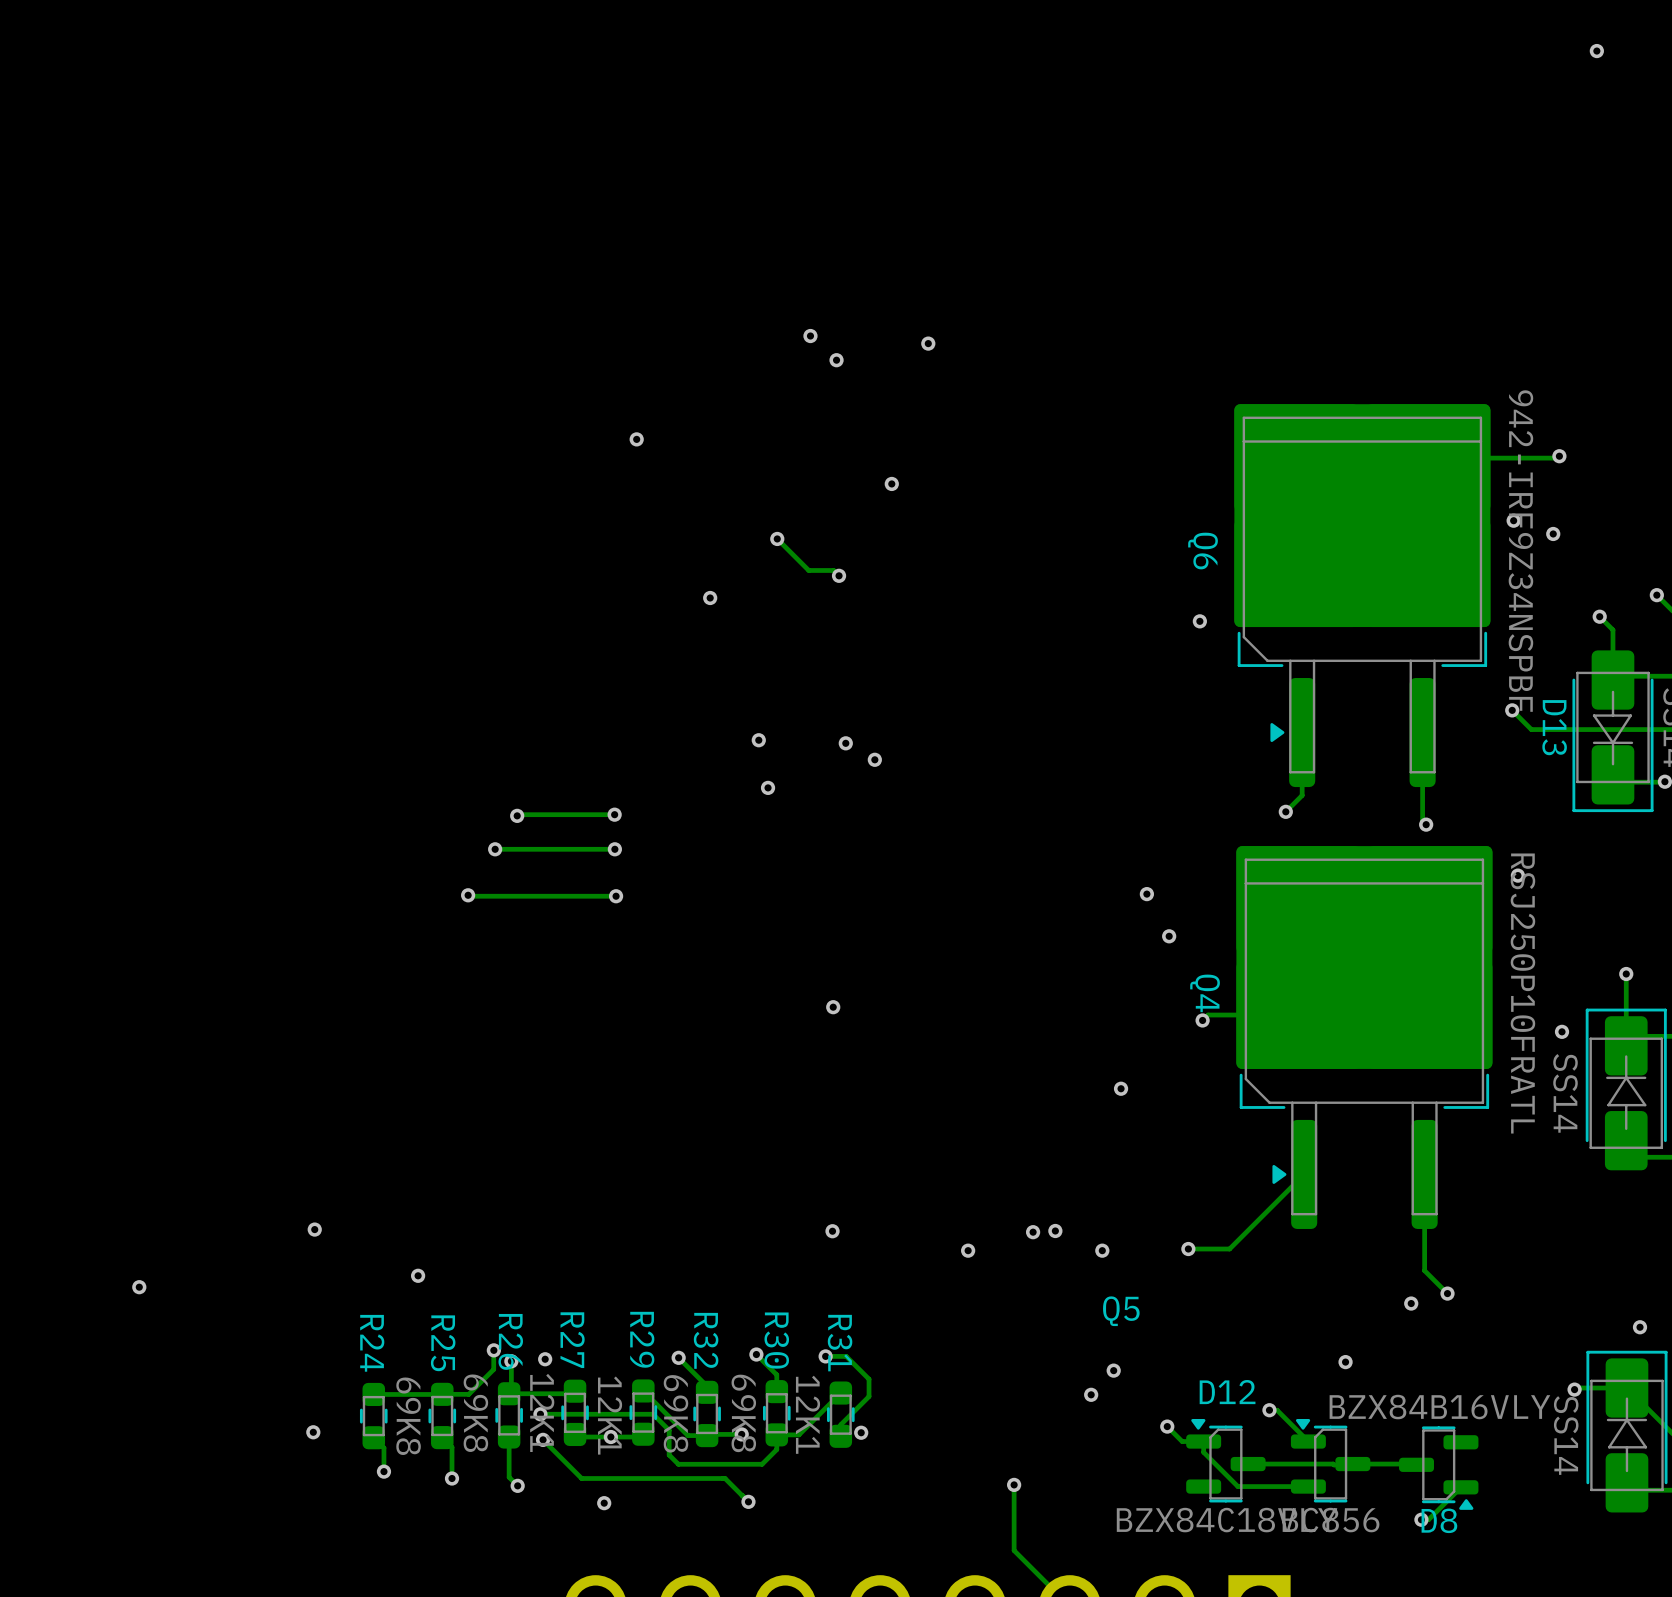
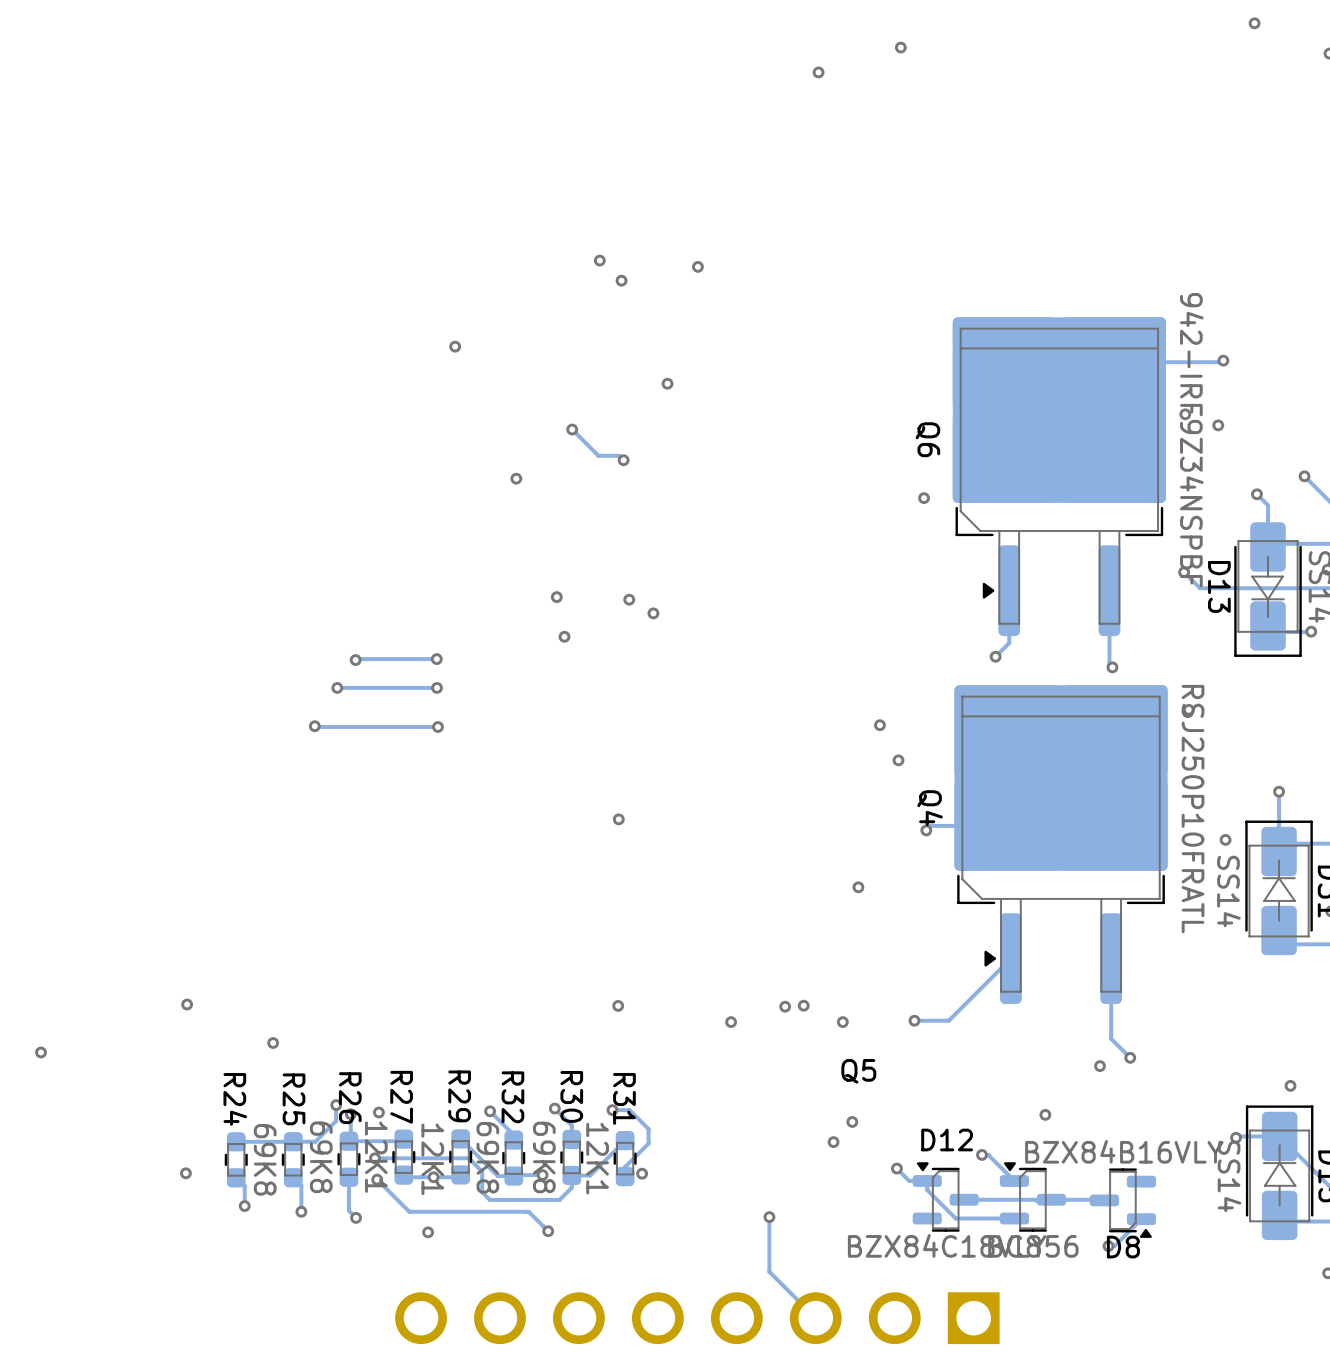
via: none -> (900, 47)
via: none -> (818, 72)

